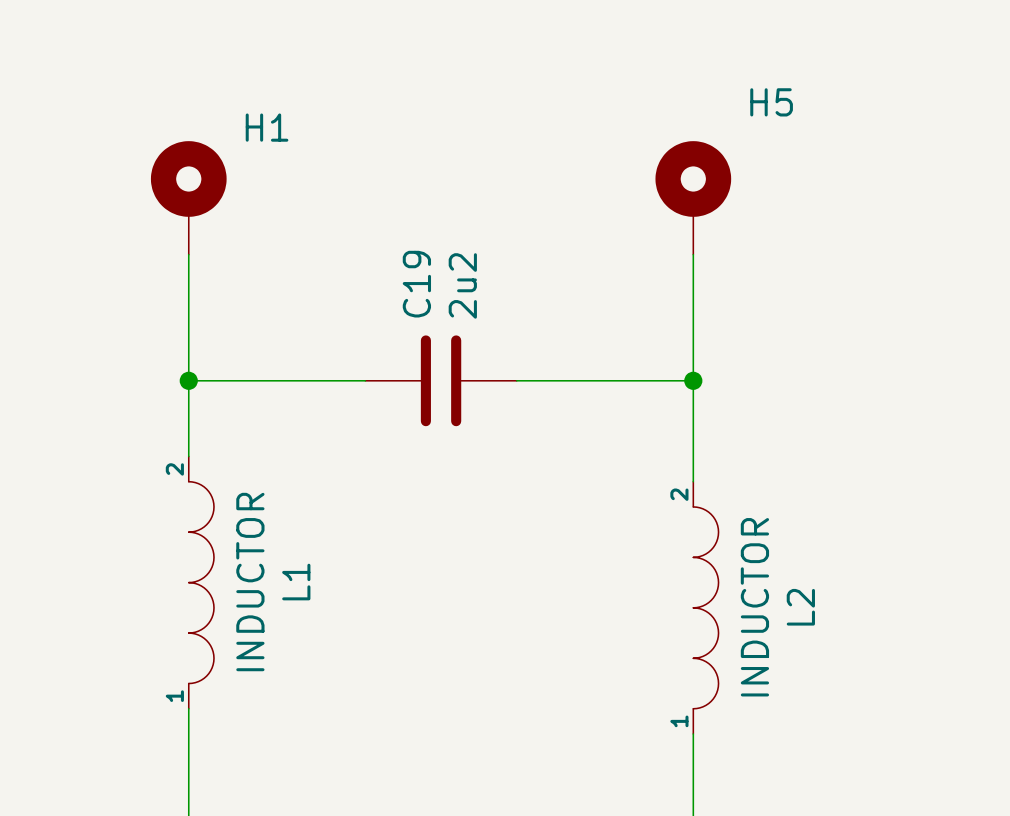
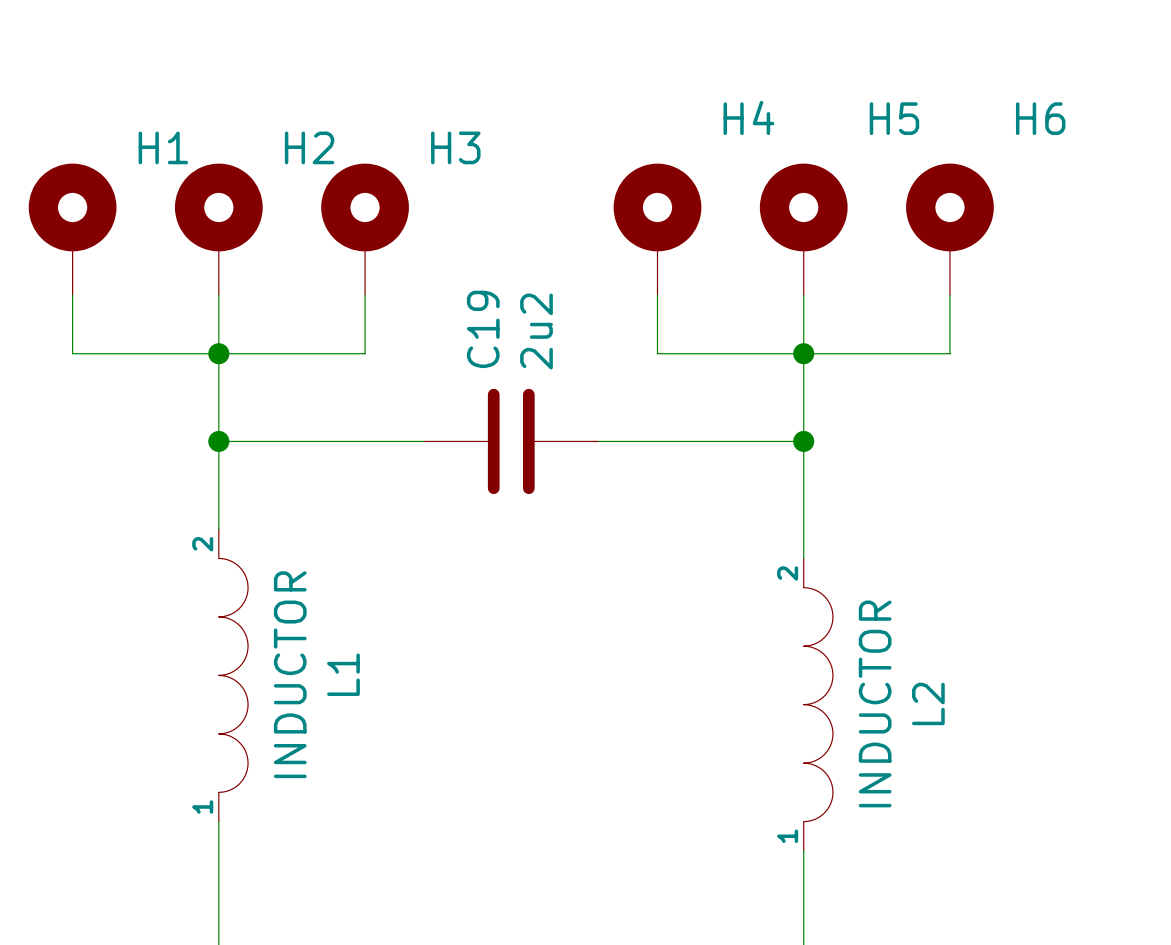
H1 name: H1 (267, 127) -> H2 (309, 147)
H1: none -> (72, 229)
H3: none -> (365, 229)
H4: none -> (657, 229)
H6: none -> (949, 229)
wire: none -> (72, 295) (72, 353) (365, 353) (365, 295)
wire: none -> (657, 295) (657, 353) (949, 353) (949, 295)
junction: none -> (218, 353)
junction: none -> (803, 353)

